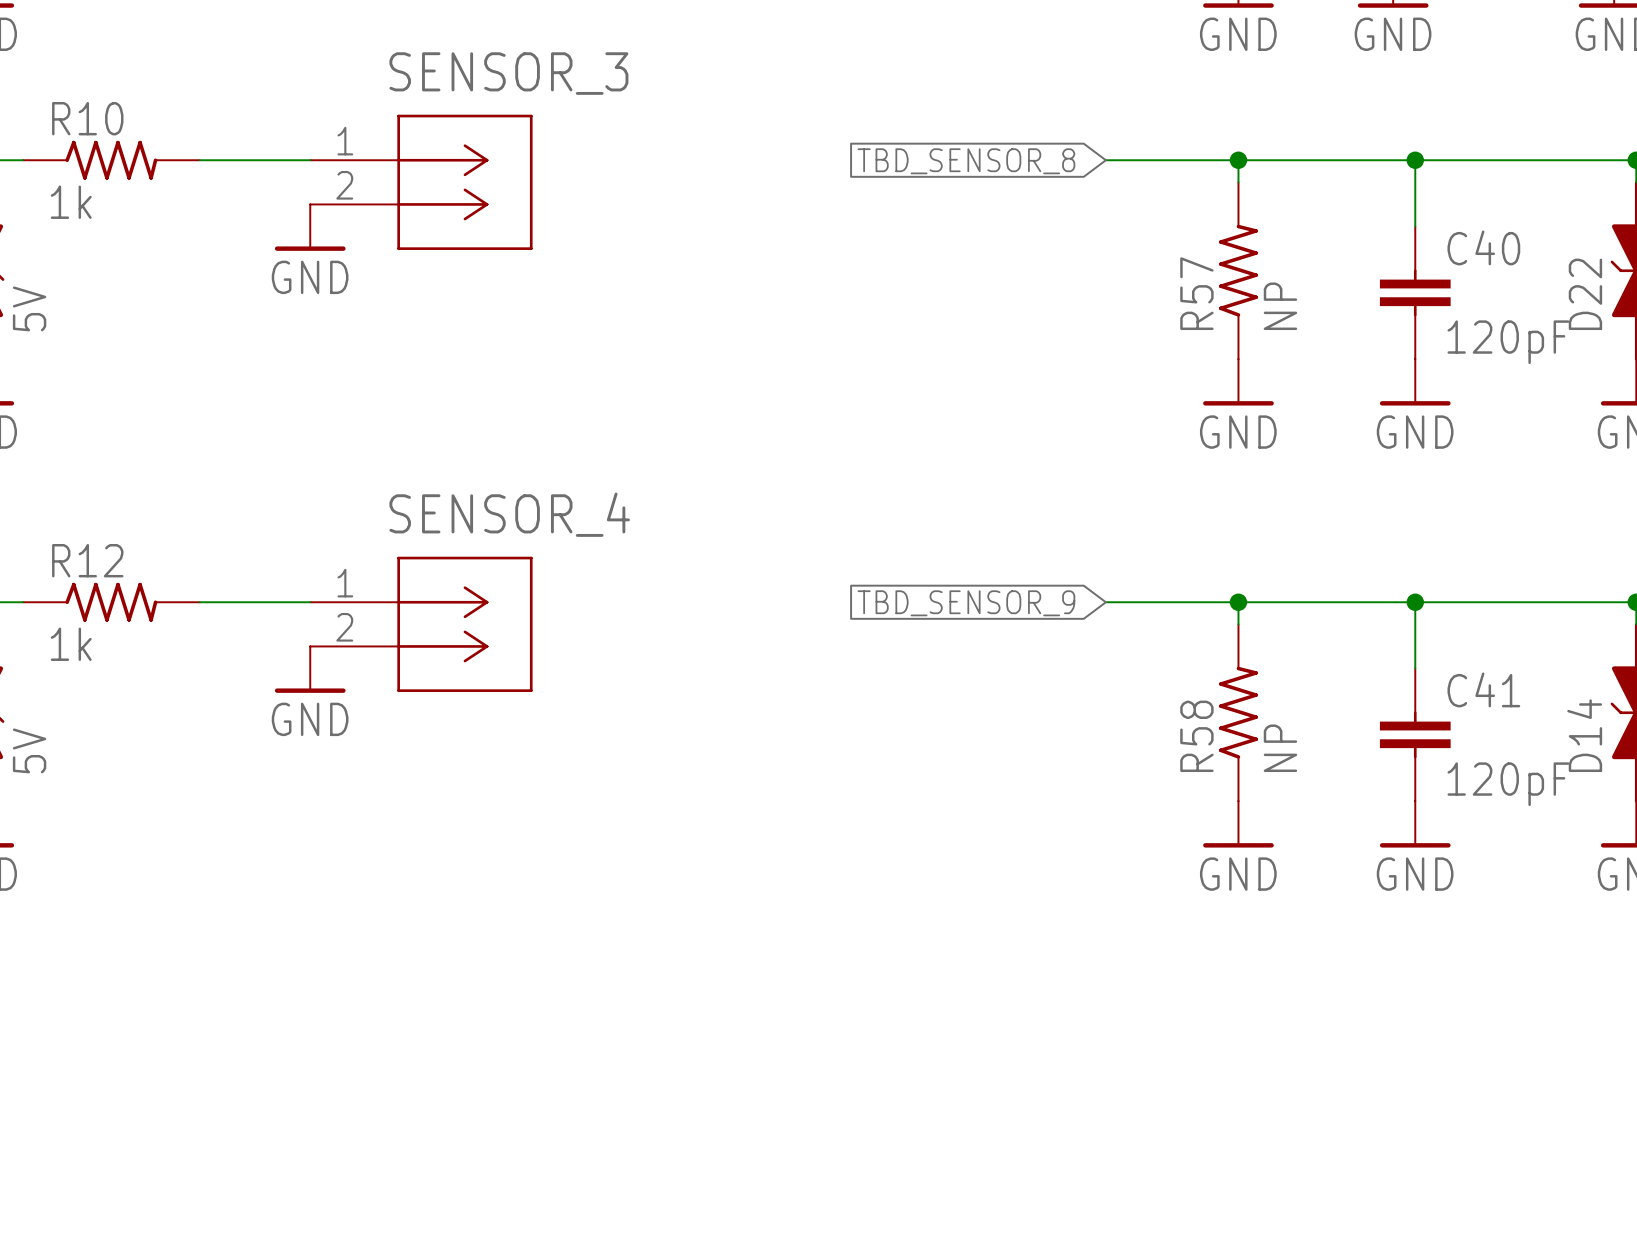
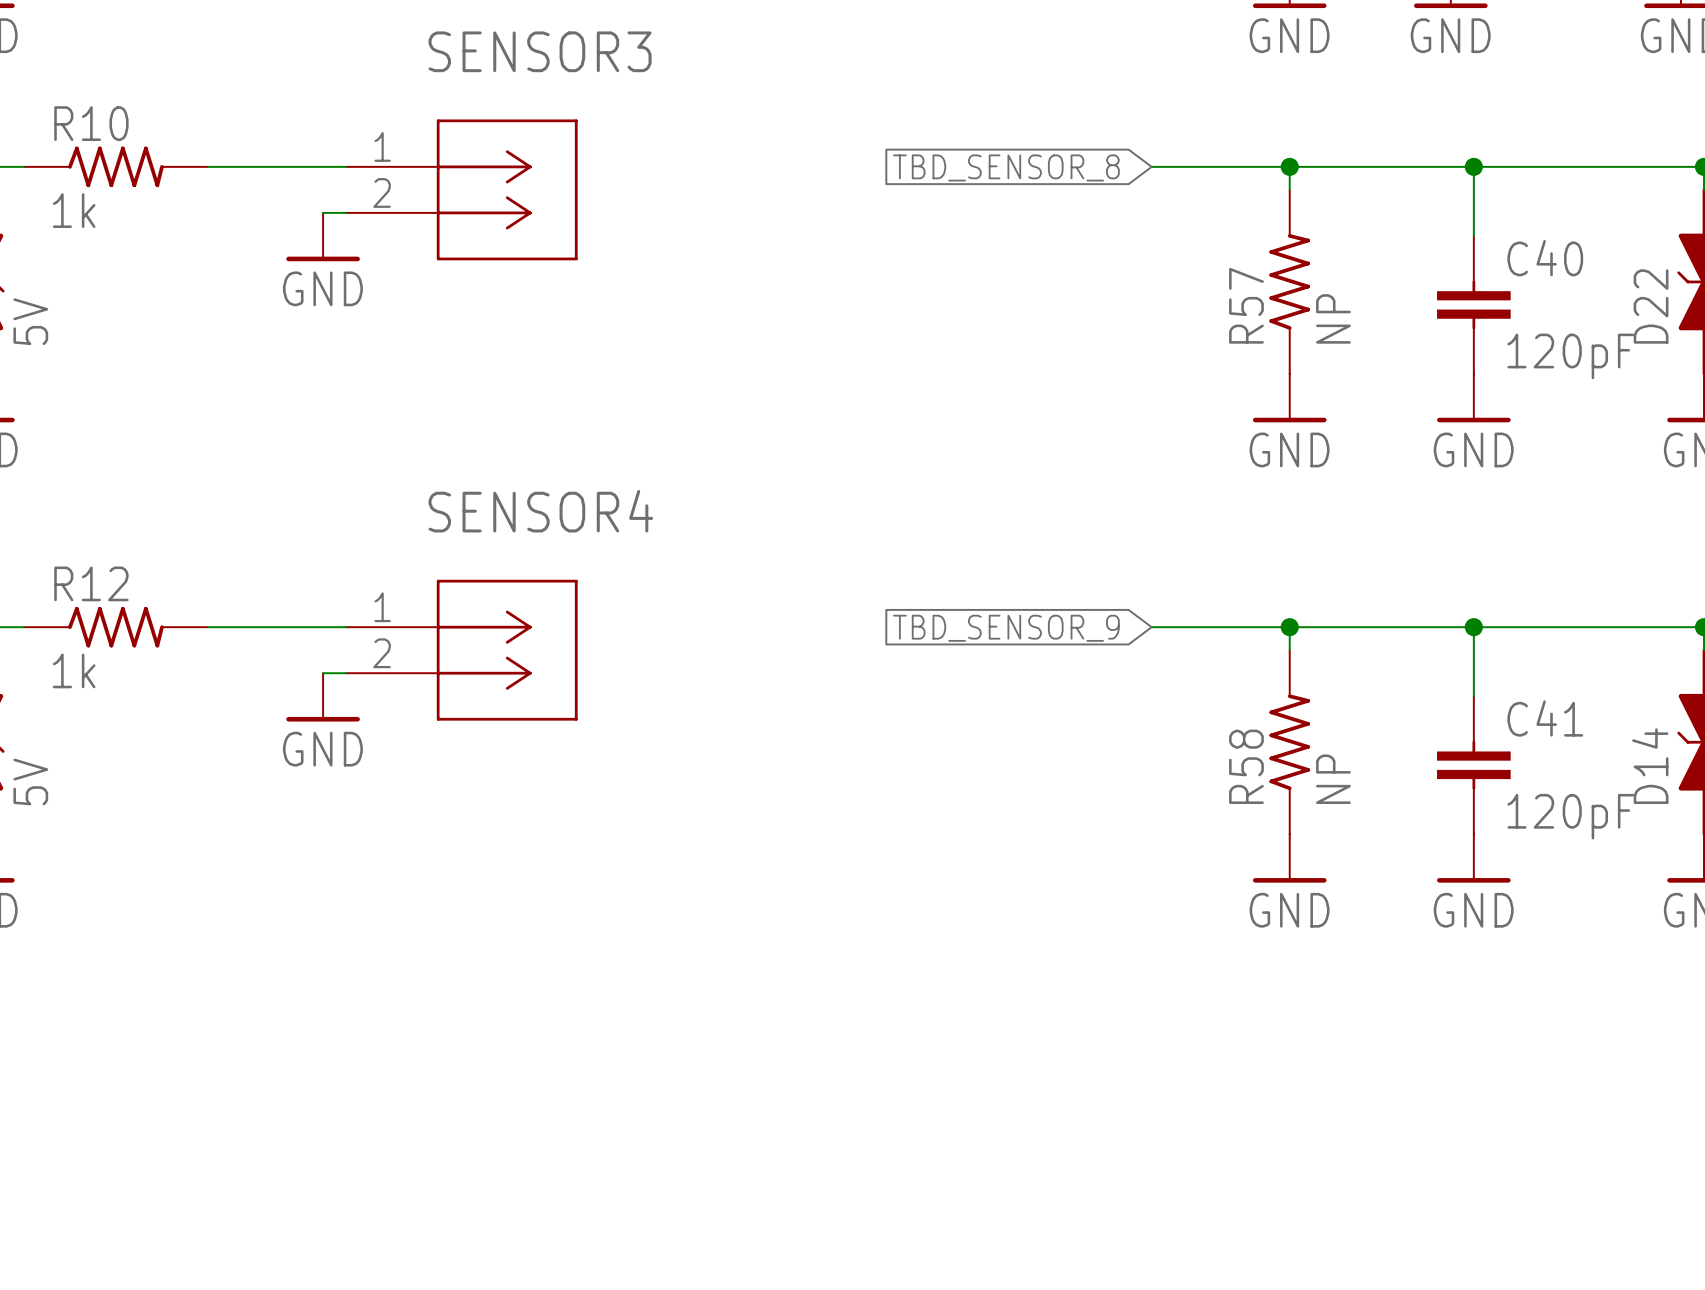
SENSOR_3: (421, 182) -> none
SENSOR3: none -> (461, 189)
SENSOR_4: (421, 624) -> none
SENSOR4: none -> (461, 650)

